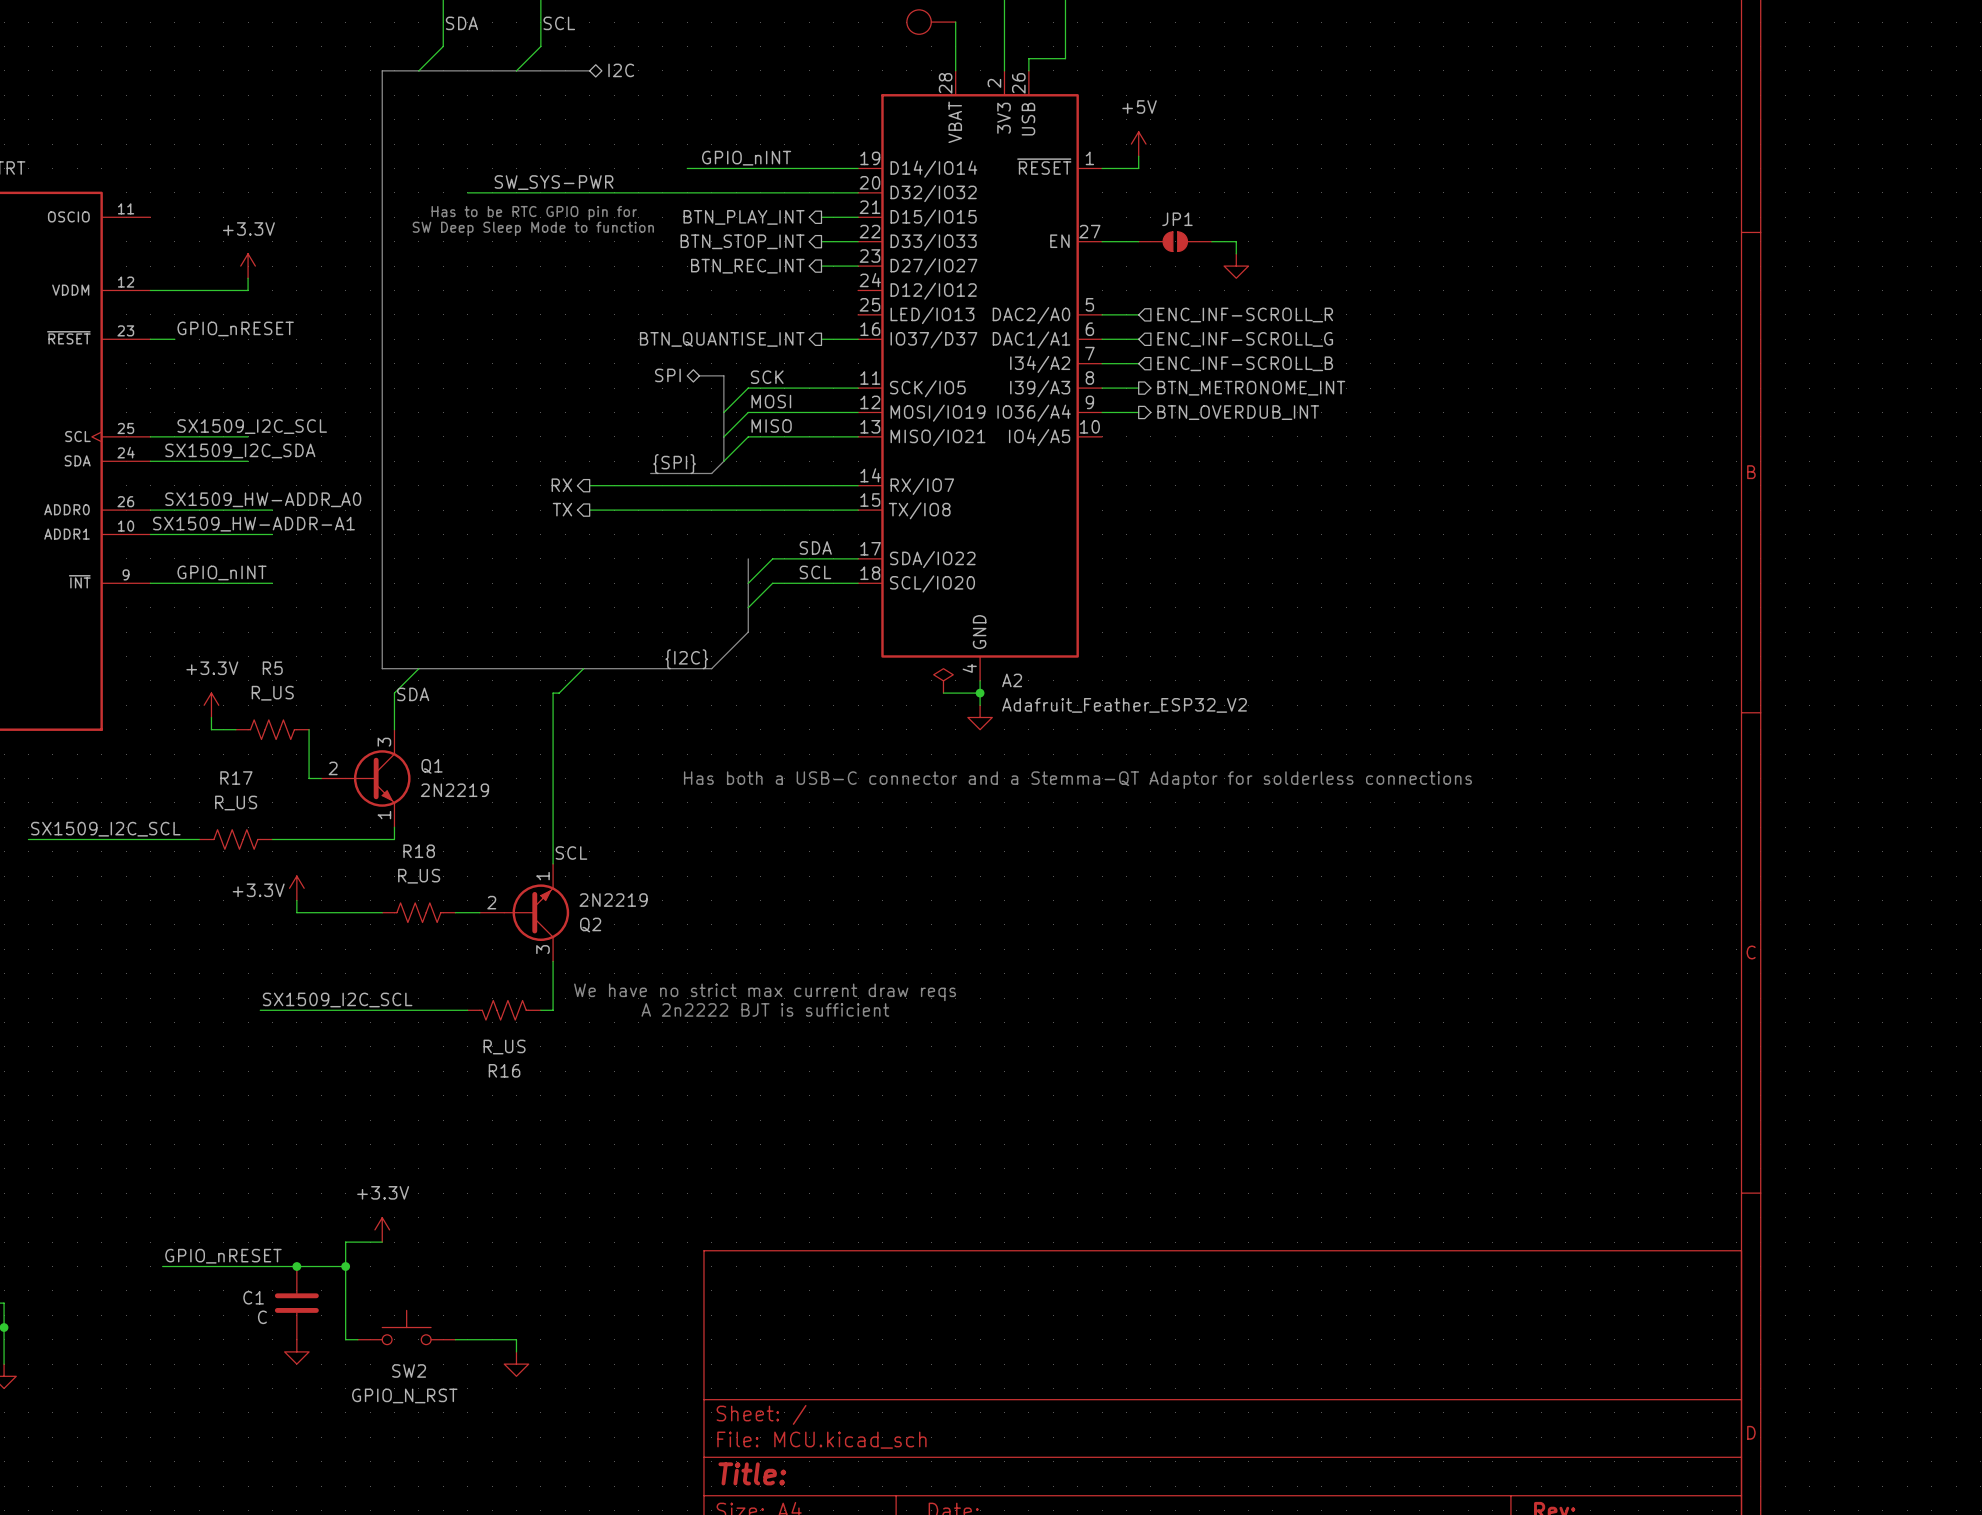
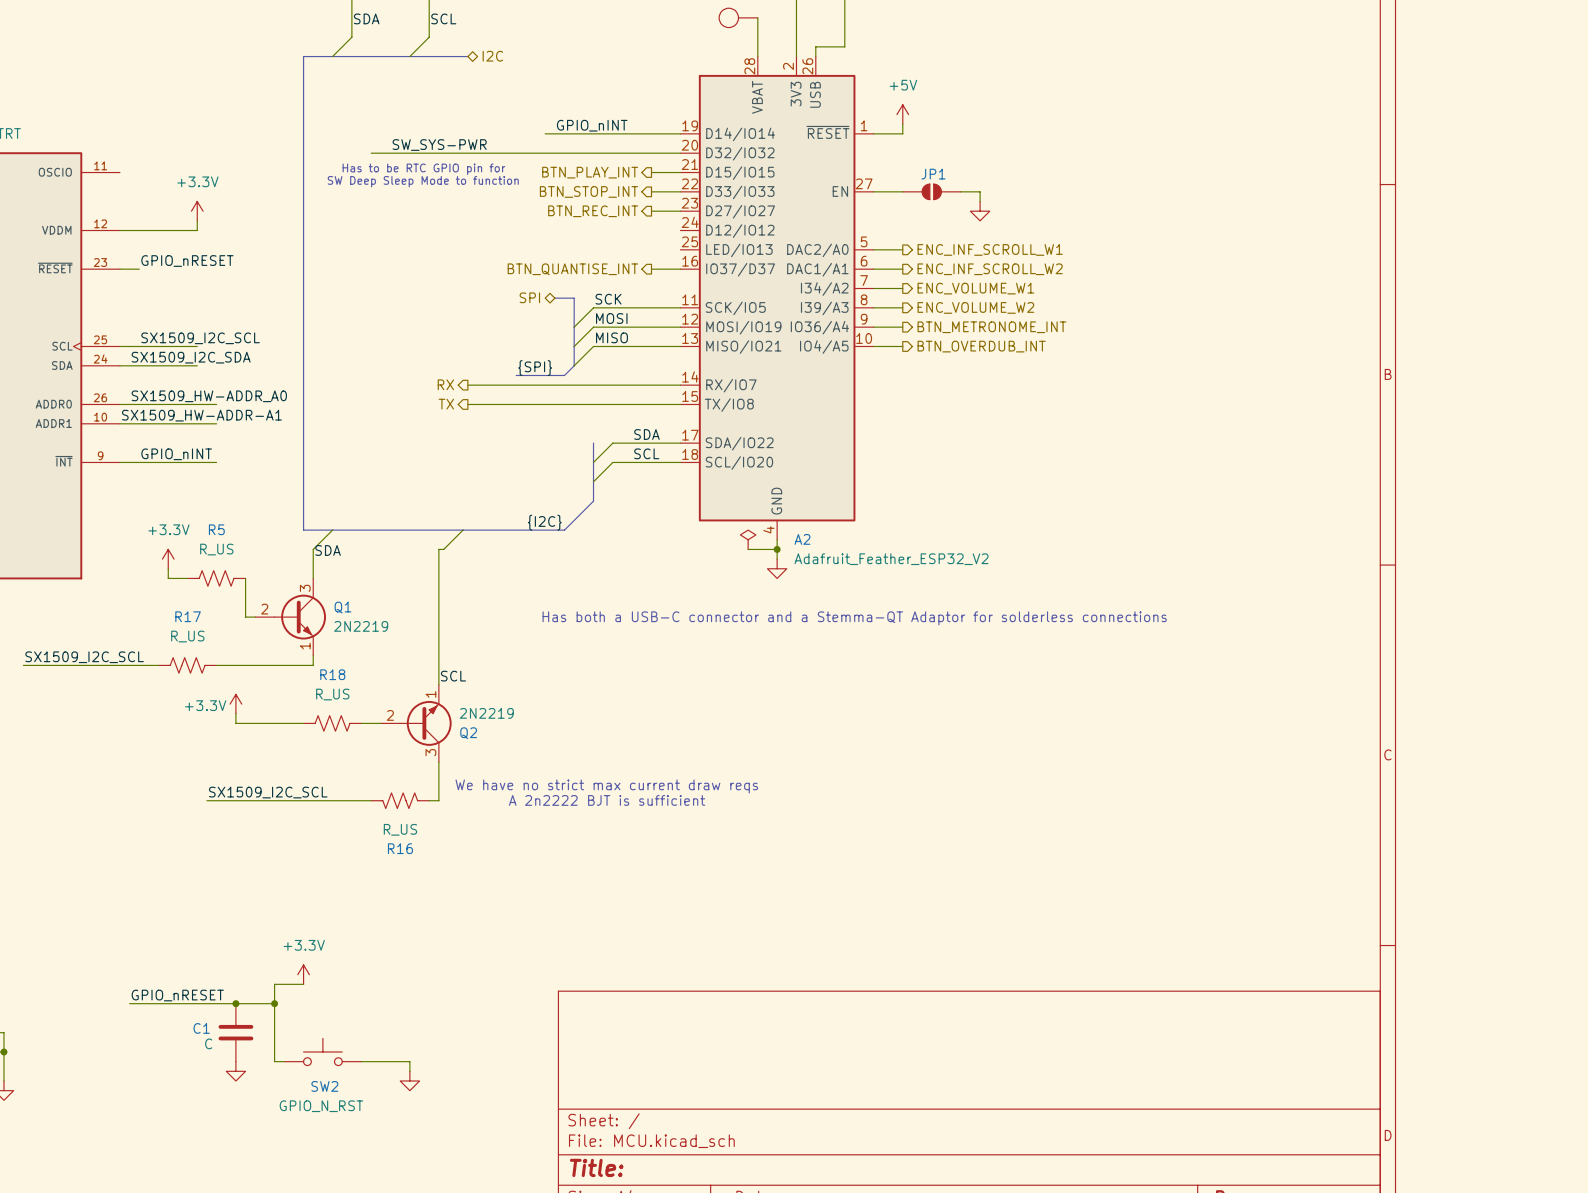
hierarchical label shape: input (1245, 315) -> output (990, 249)
hierarchical label: ENC_INF-SCROLL_R (1245, 315) -> ENC_INF_SCROLL_W1 (990, 249)
hierarchical label shape: input (1245, 339) -> output (990, 269)
hierarchical label: ENC_INF-SCROLL_G (1245, 339) -> ENC_INF_SCROLL_W2 (990, 269)
hierarchical label shape: input (1245, 363) -> output (975, 288)
hierarchical label: ENC_INF-SCROLL_B (1245, 363) -> ENC_VOLUME_W1 (975, 288)
hierarchical label: BTN_METRONOME_INT (1251, 388) -> ENC_VOLUME_W2 (975, 307)
hierarchical label: BTN_OVERDUB_INT (1238, 412) -> BTN_METRONOME_INT (991, 327)
wire: none -> (873, 346) (902, 346)
hierarchical label: none -> BTN_OVERDUB_INT (981, 346)

